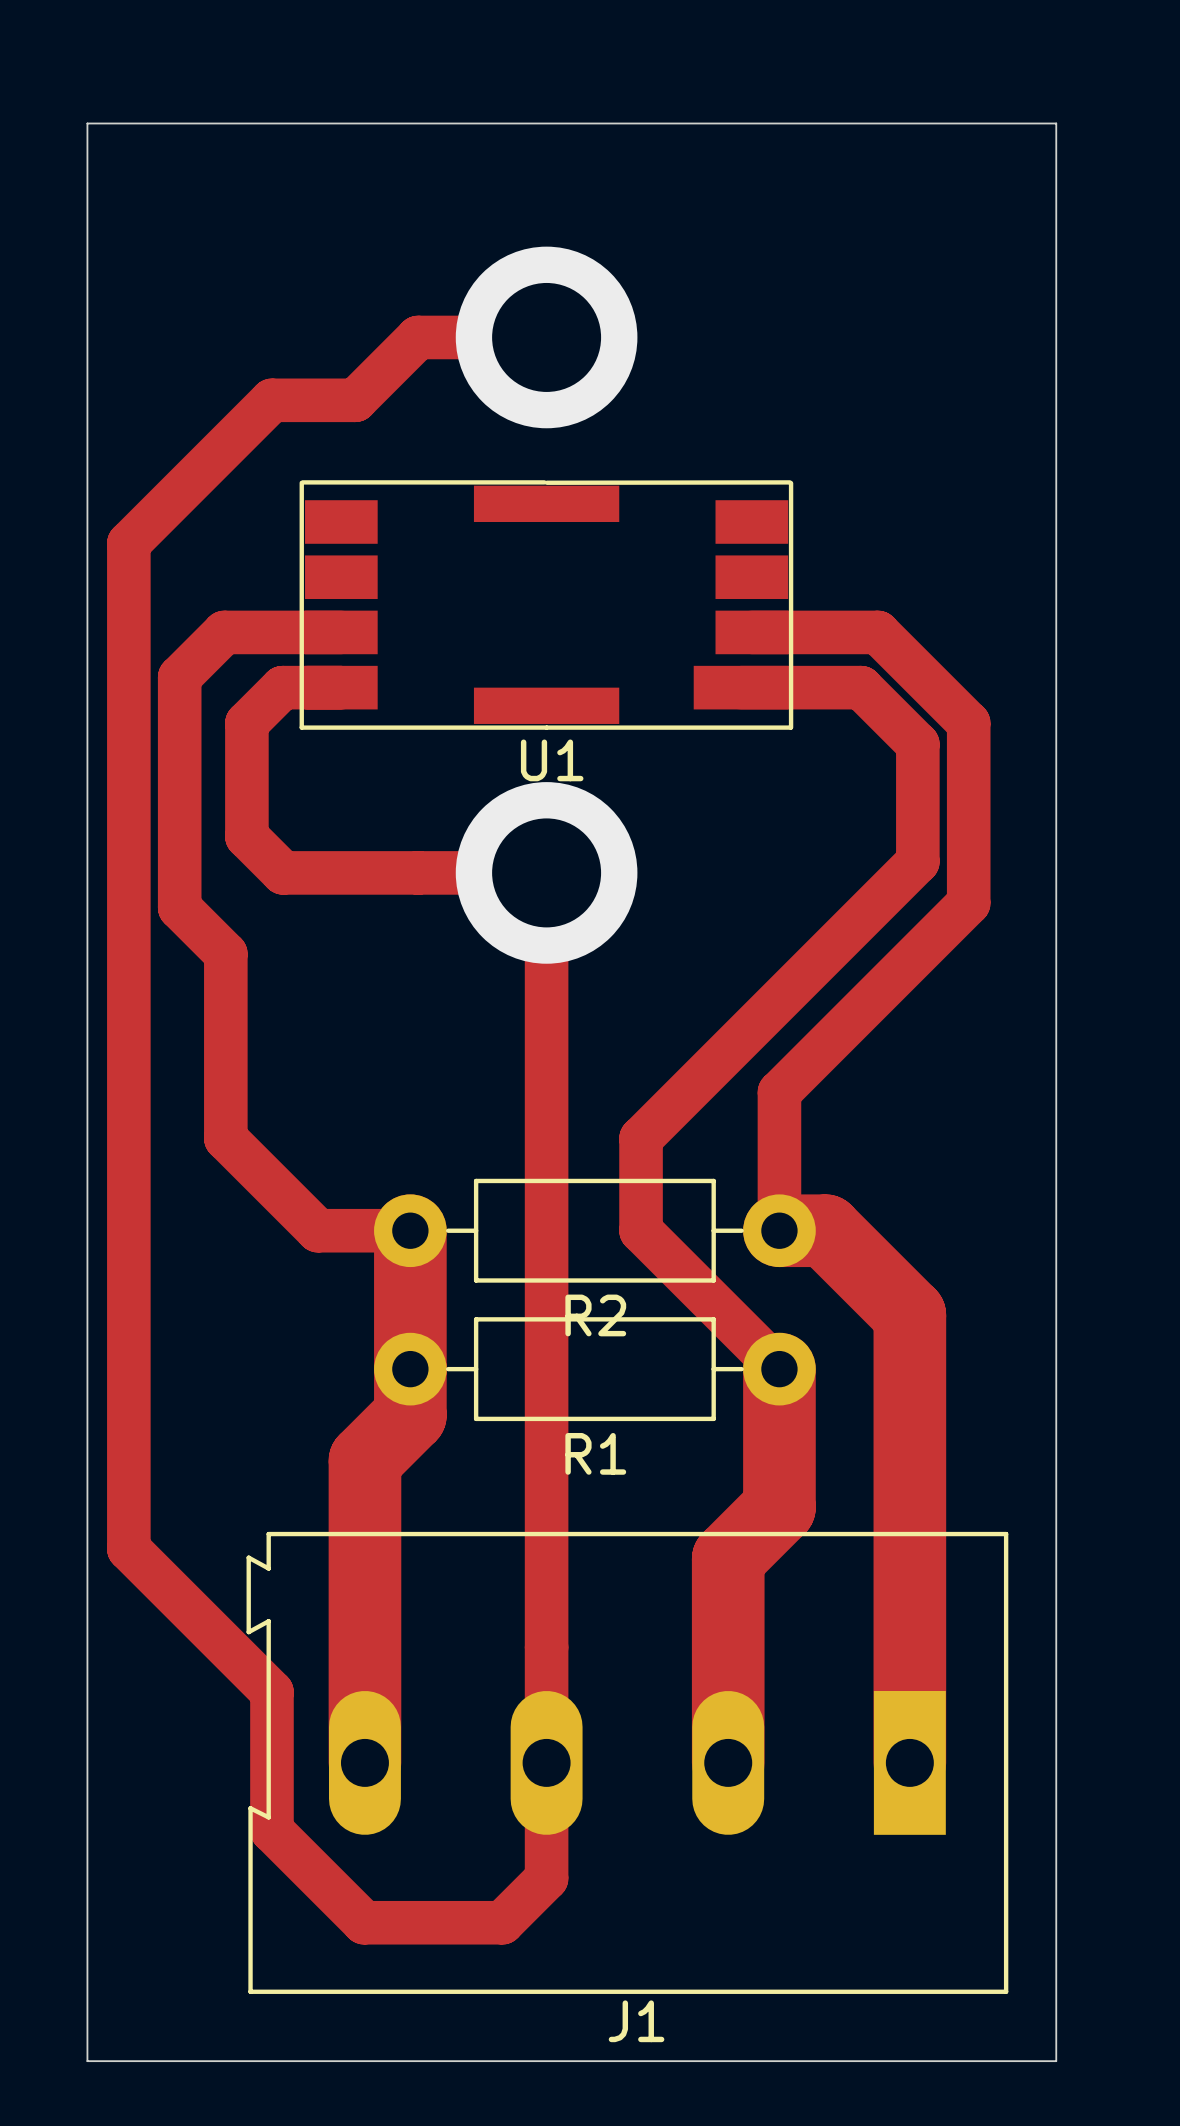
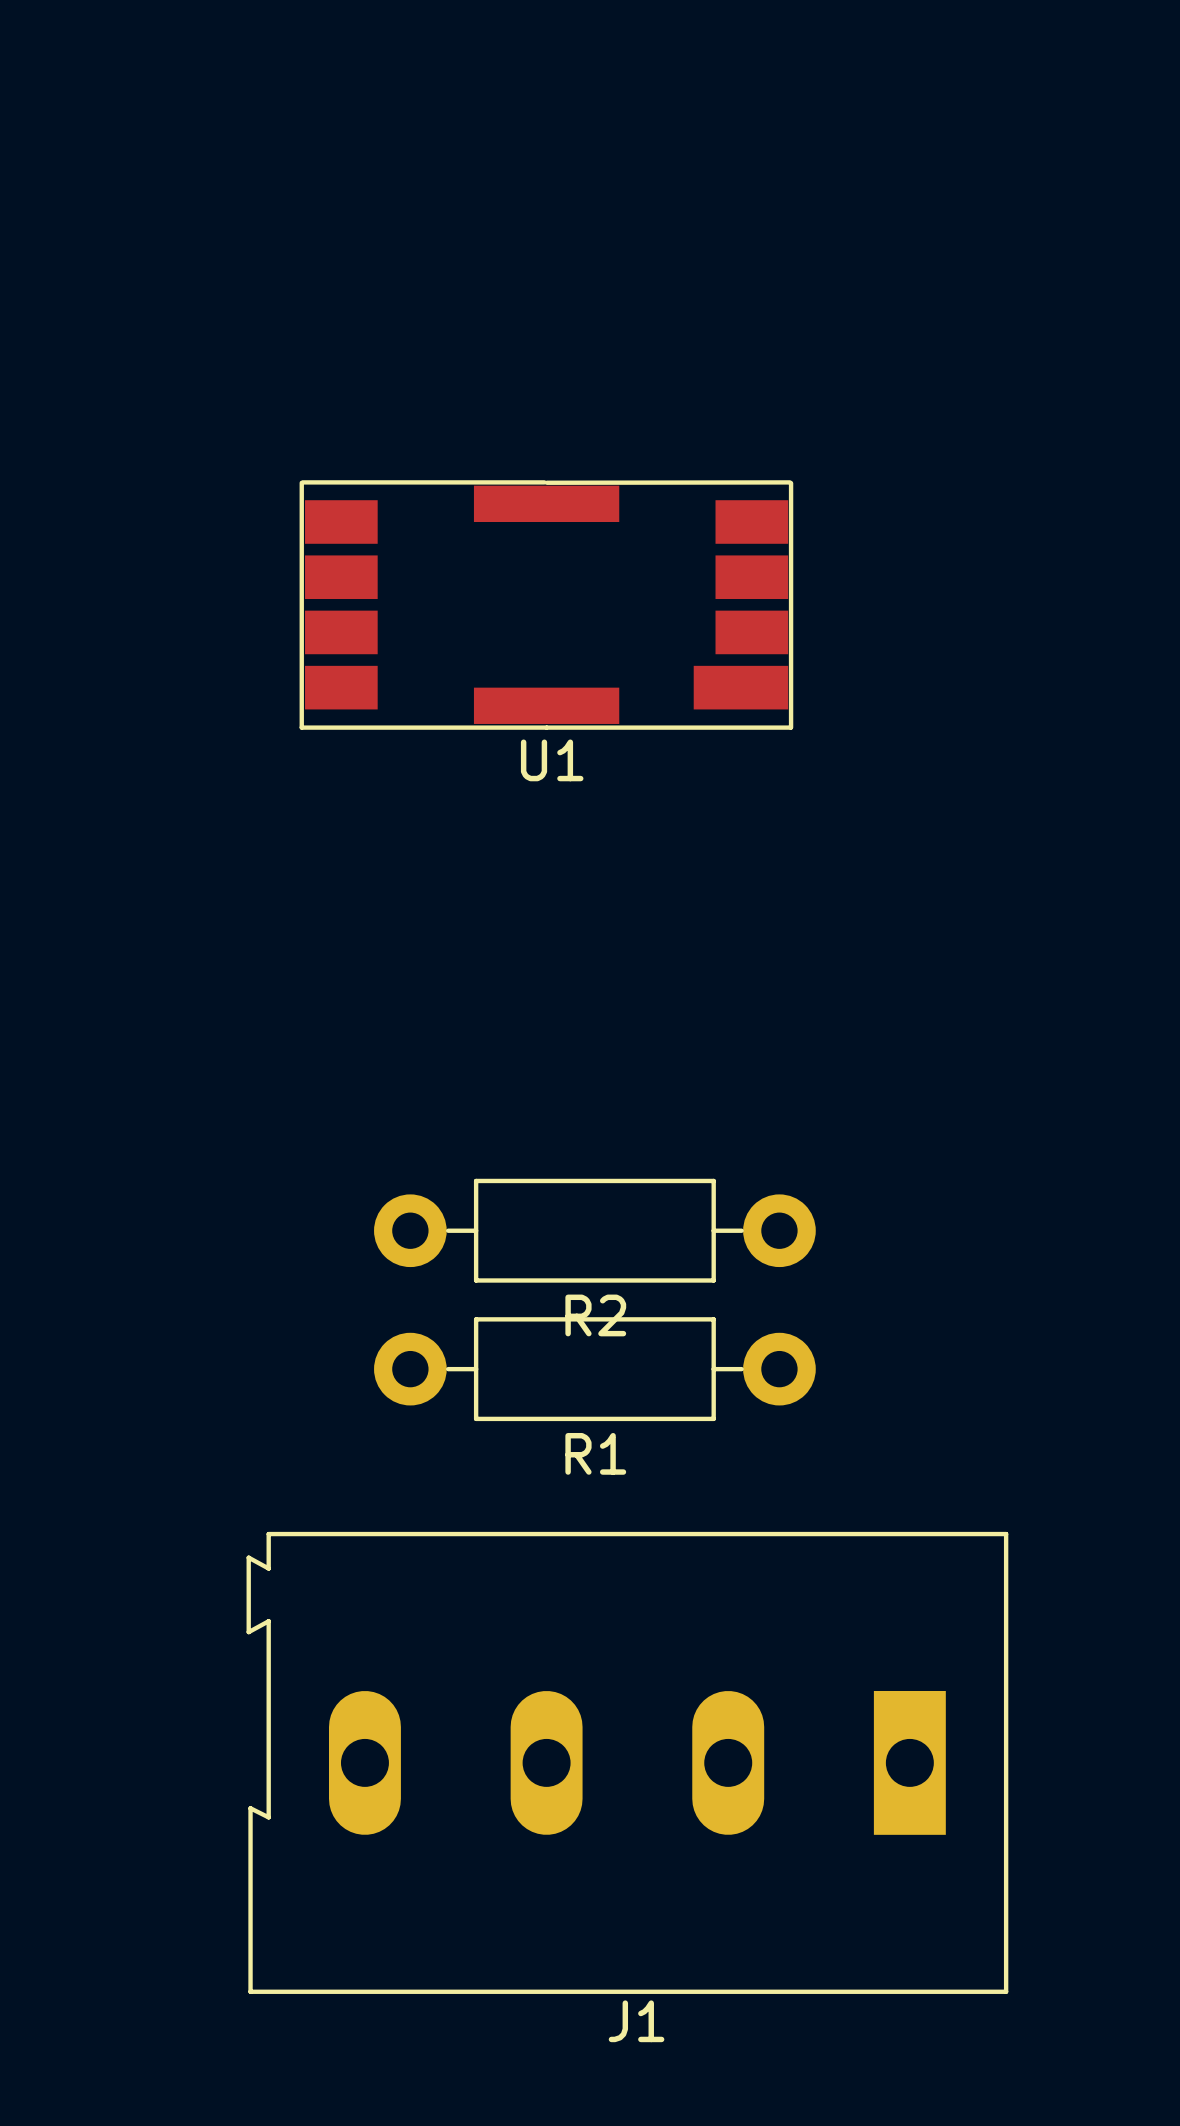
board edge: (87, 123) (87, 2061) (1056, 2061) (1056, 123) (87, 123) -> none
track: (546, 337) (418, 337) (355, 400) (271, 400) (128, 543) (128, 1548) (271, 1692) (271, 1830) (364, 1922) (502, 1922) (546, 1878) (546, 872) (283, 872) (246, 836) (246, 723) (282, 687) (341, 687) -> none
via: (546, 337) -> none
track: (341, 632) (224, 632) (179, 677) (179, 907) (225, 953) (225, 1138) (318, 1230) (410, 1230) (410, 1415) (364, 1460) (364, 1762) -> none
track: (751, 632) (877, 632) (968, 723) (968, 903) (779, 1092) (779, 1230) (825, 1230) (909, 1315) (909, 1762) -> none
track: (740, 687) (861, 687) (917, 744) (917, 861) (641, 1138) (641, 1230) (779, 1369) (779, 1507) (728, 1558) (728, 1762) -> none
via: (546, 872) -> none

